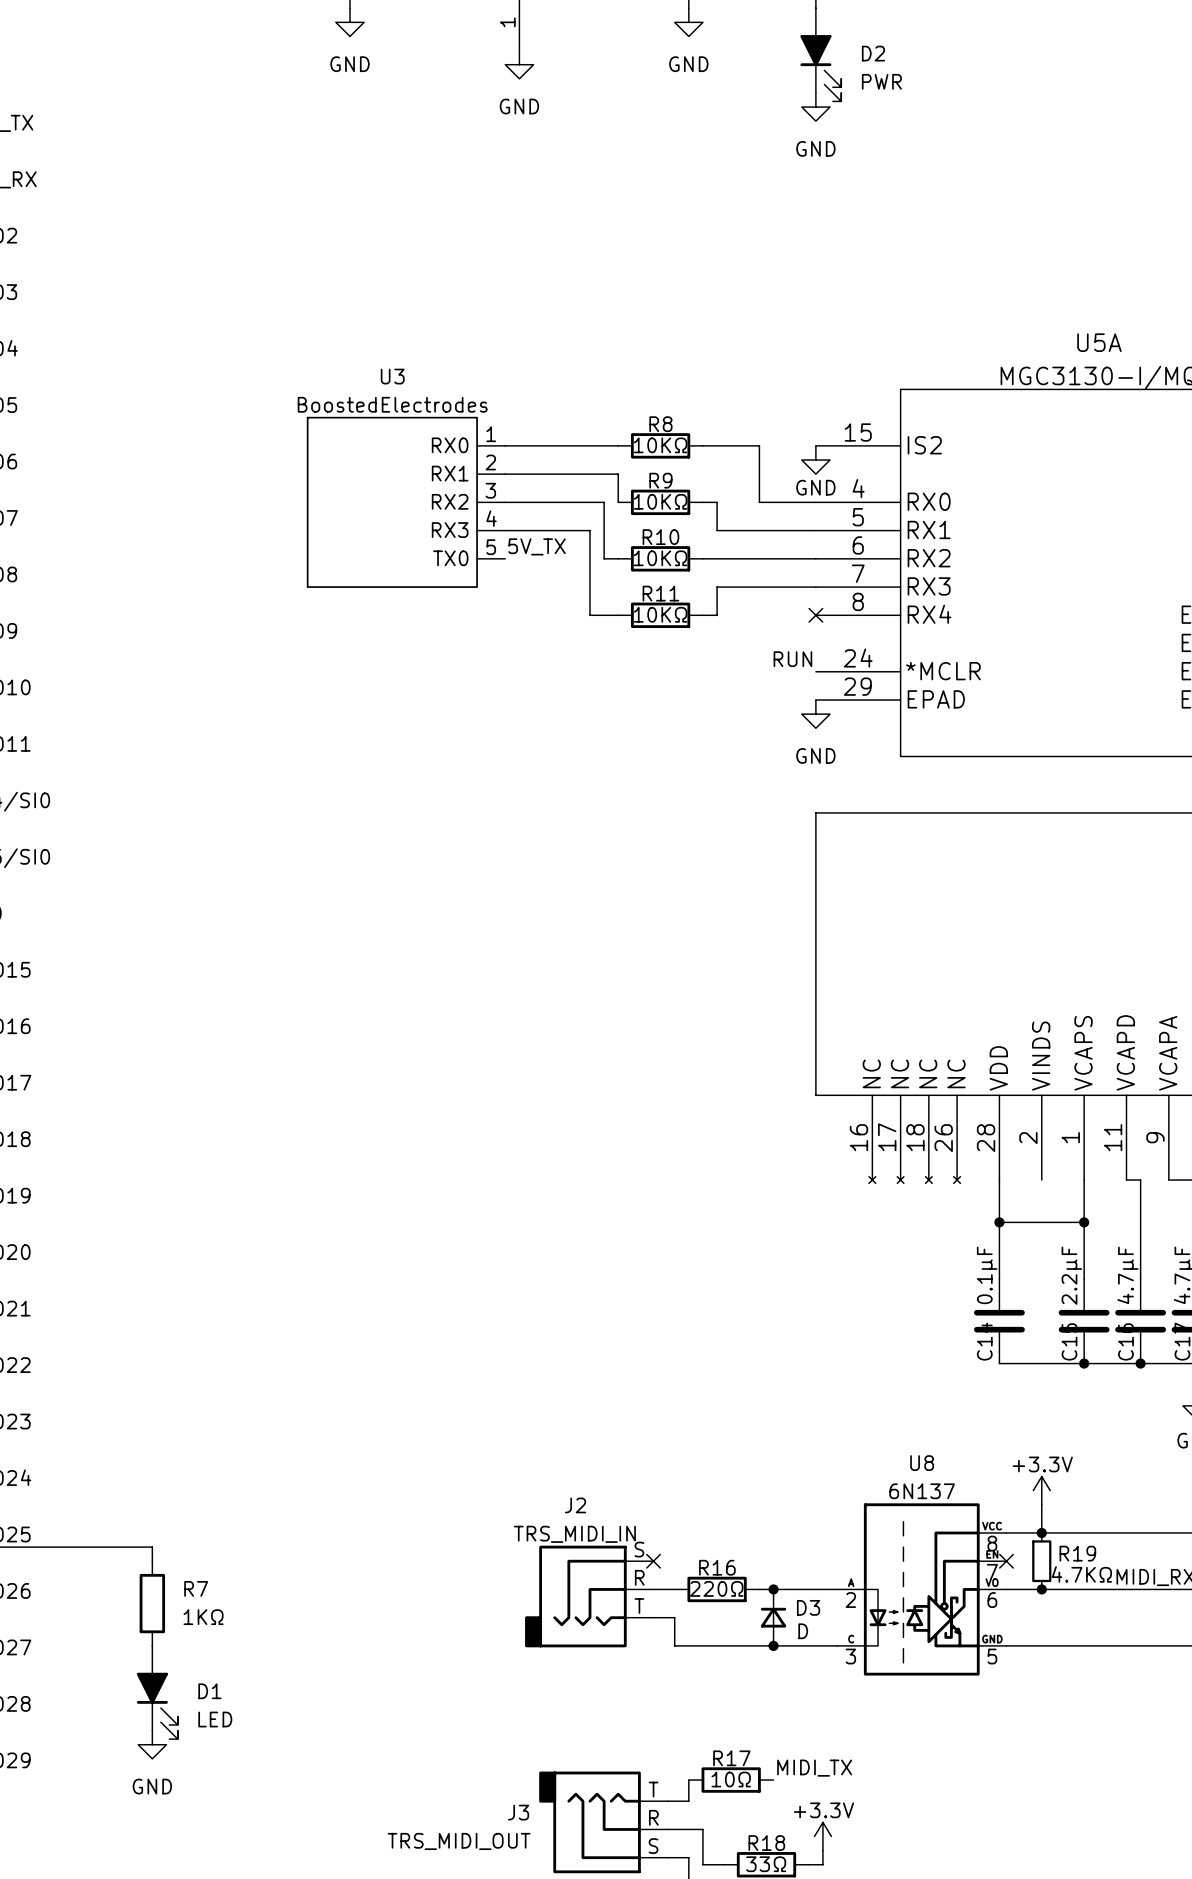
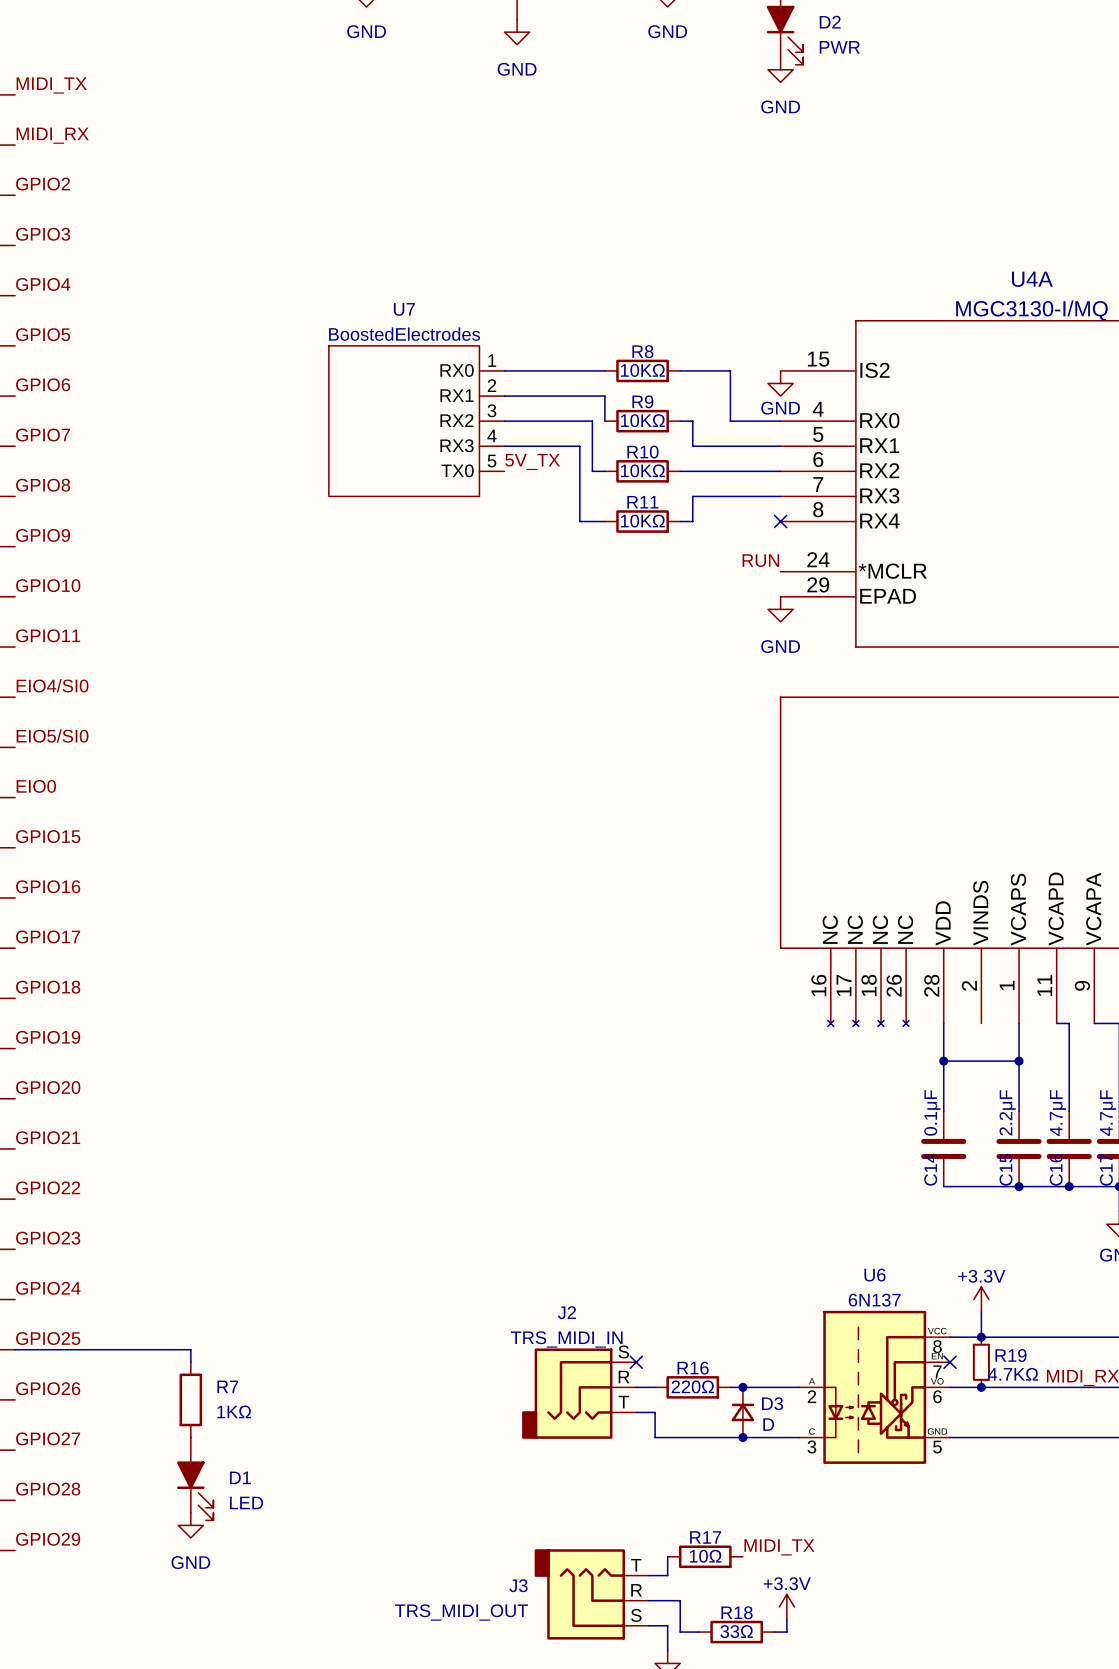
U5A name: U5A (1099, 342) -> U4A (1032, 279)
U3 name: U3 (392, 376) -> U7 (404, 309)
U8 name: U8 (922, 1463) -> U6 (875, 1275)

